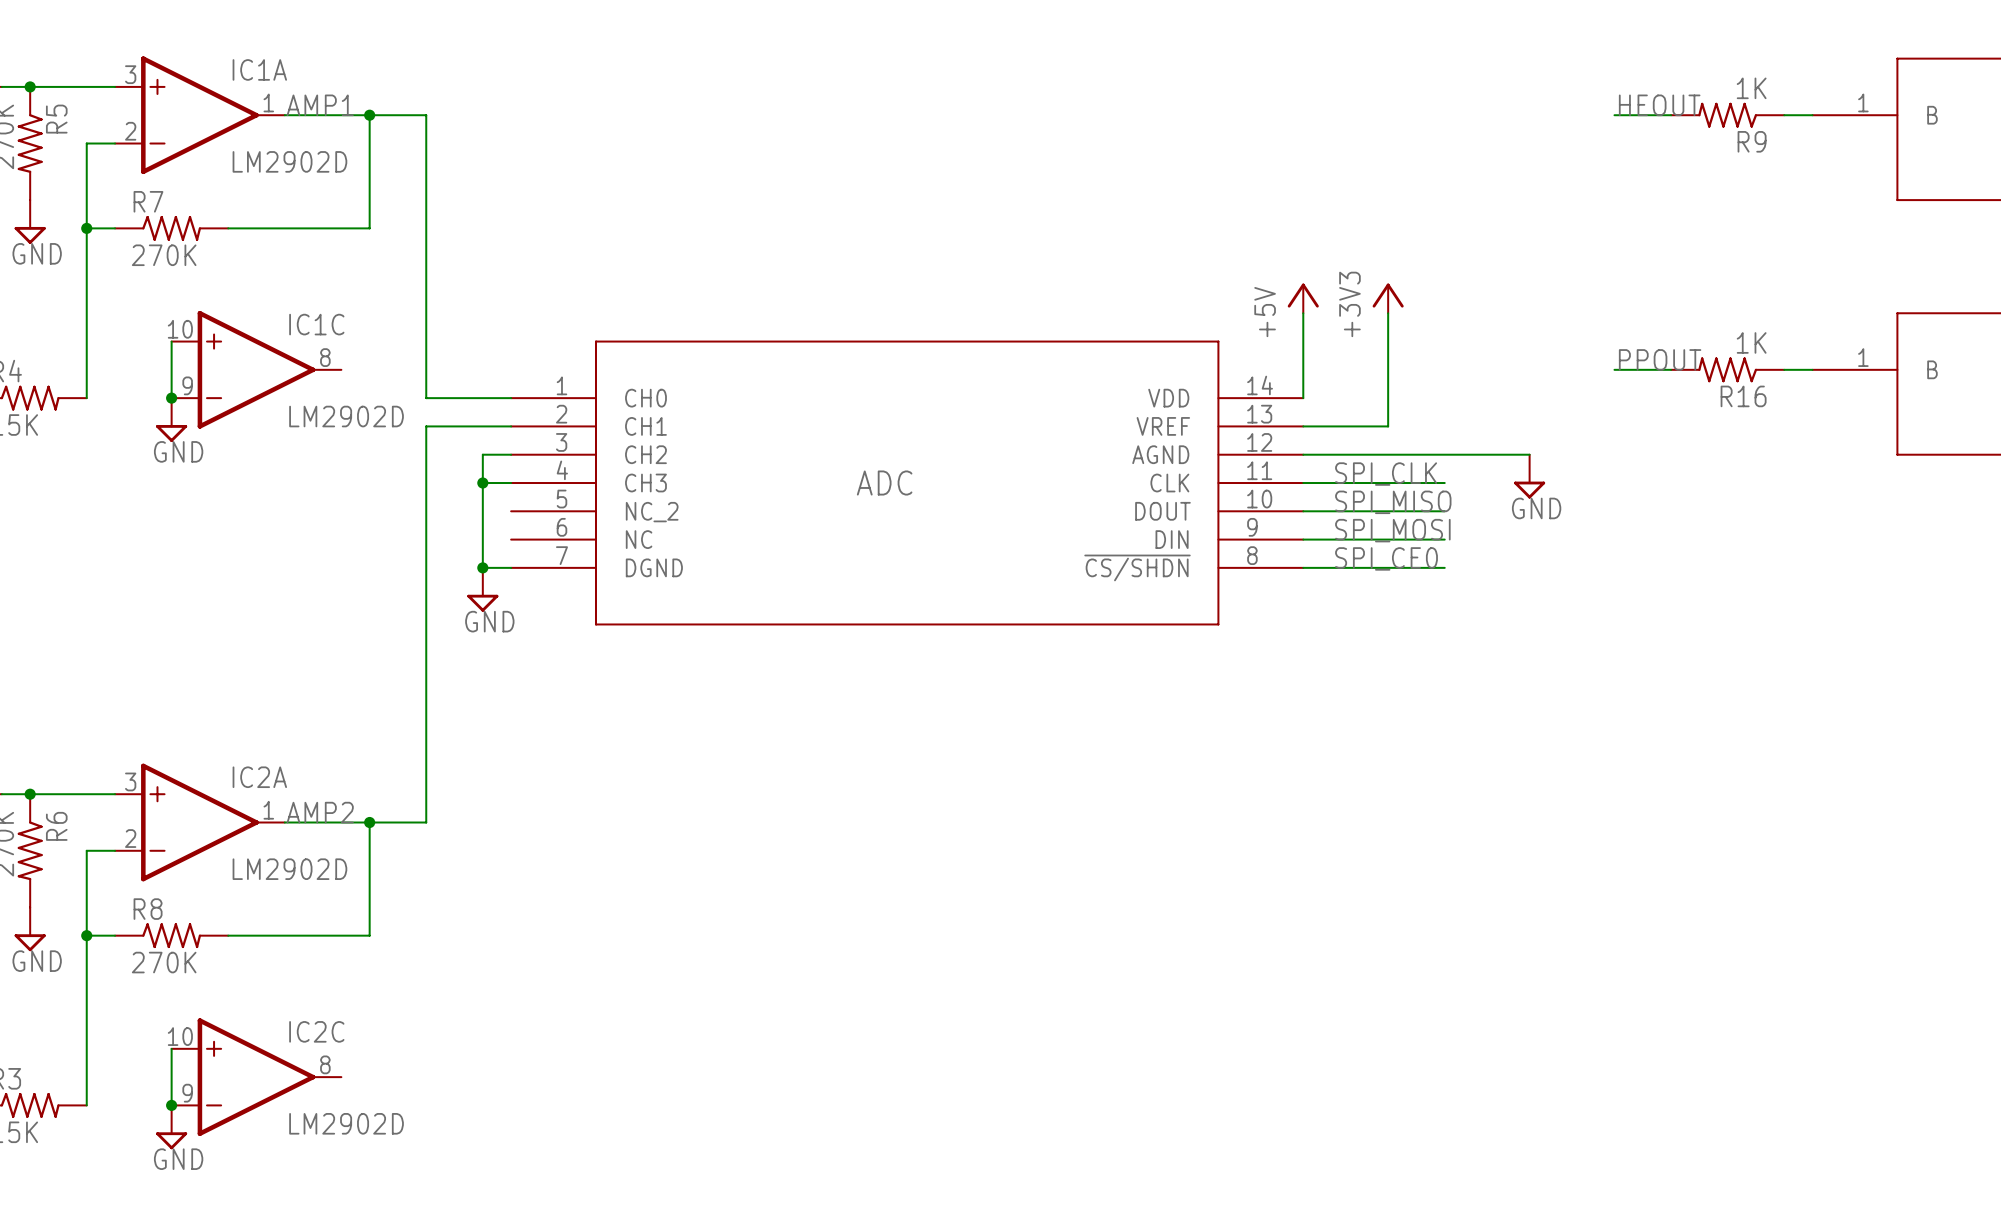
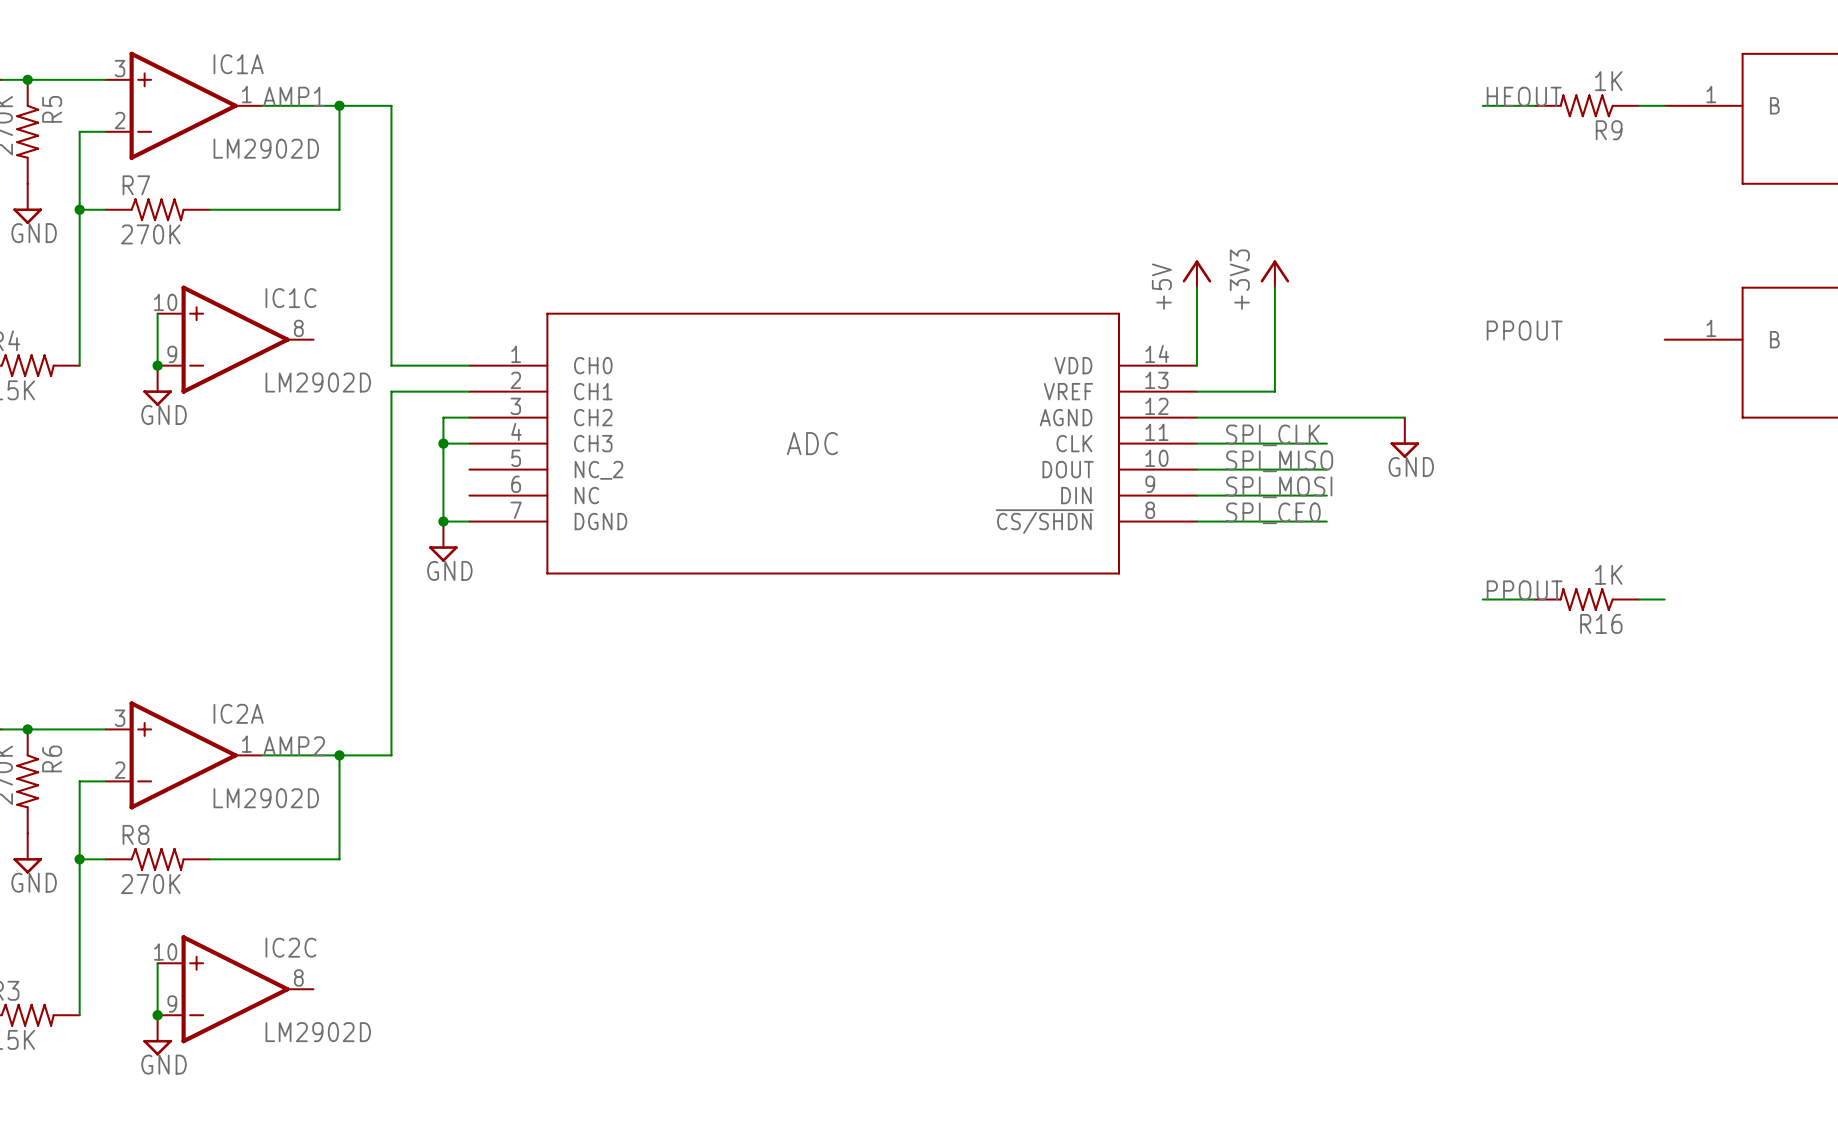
wire: (1614, 369) (1671, 369) -> none
R16 position: (1727, 369) -> (1586, 599)
wire: (1784, 369) (1812, 369) -> none
label: none -> PPOUT (1524, 590)
wire: none -> (1482, 599) (1534, 599)
wire: none -> (1638, 599) (1664, 599)

